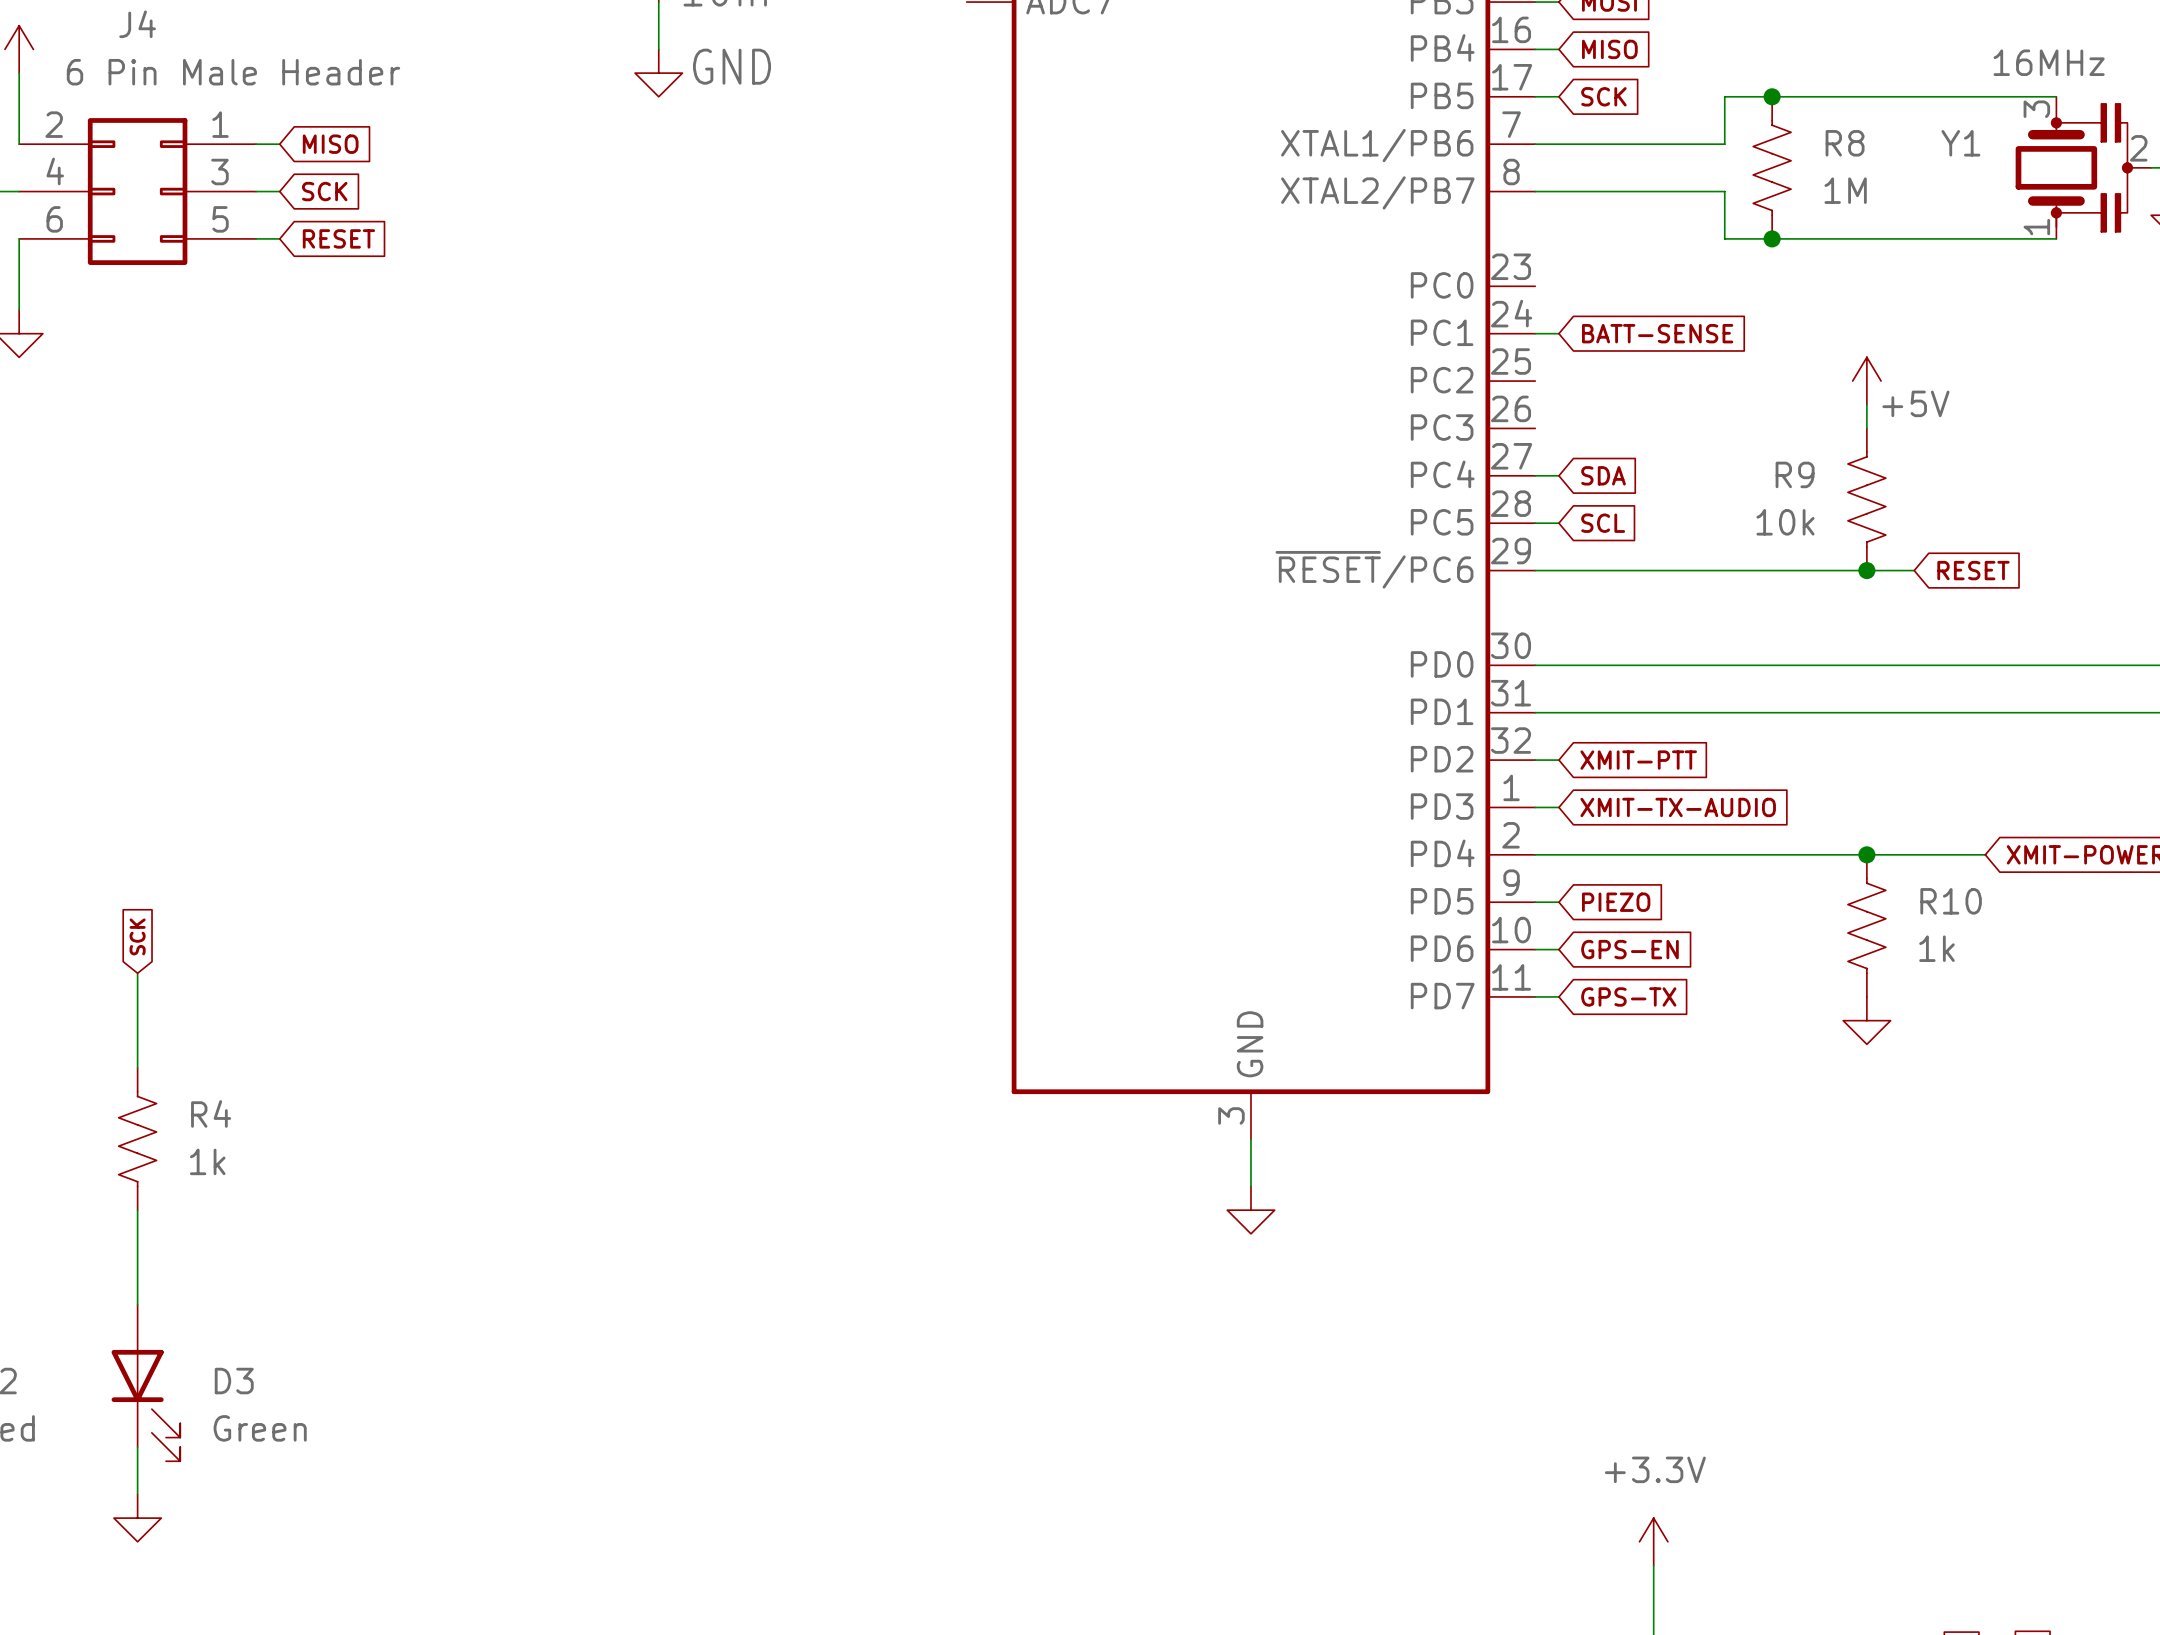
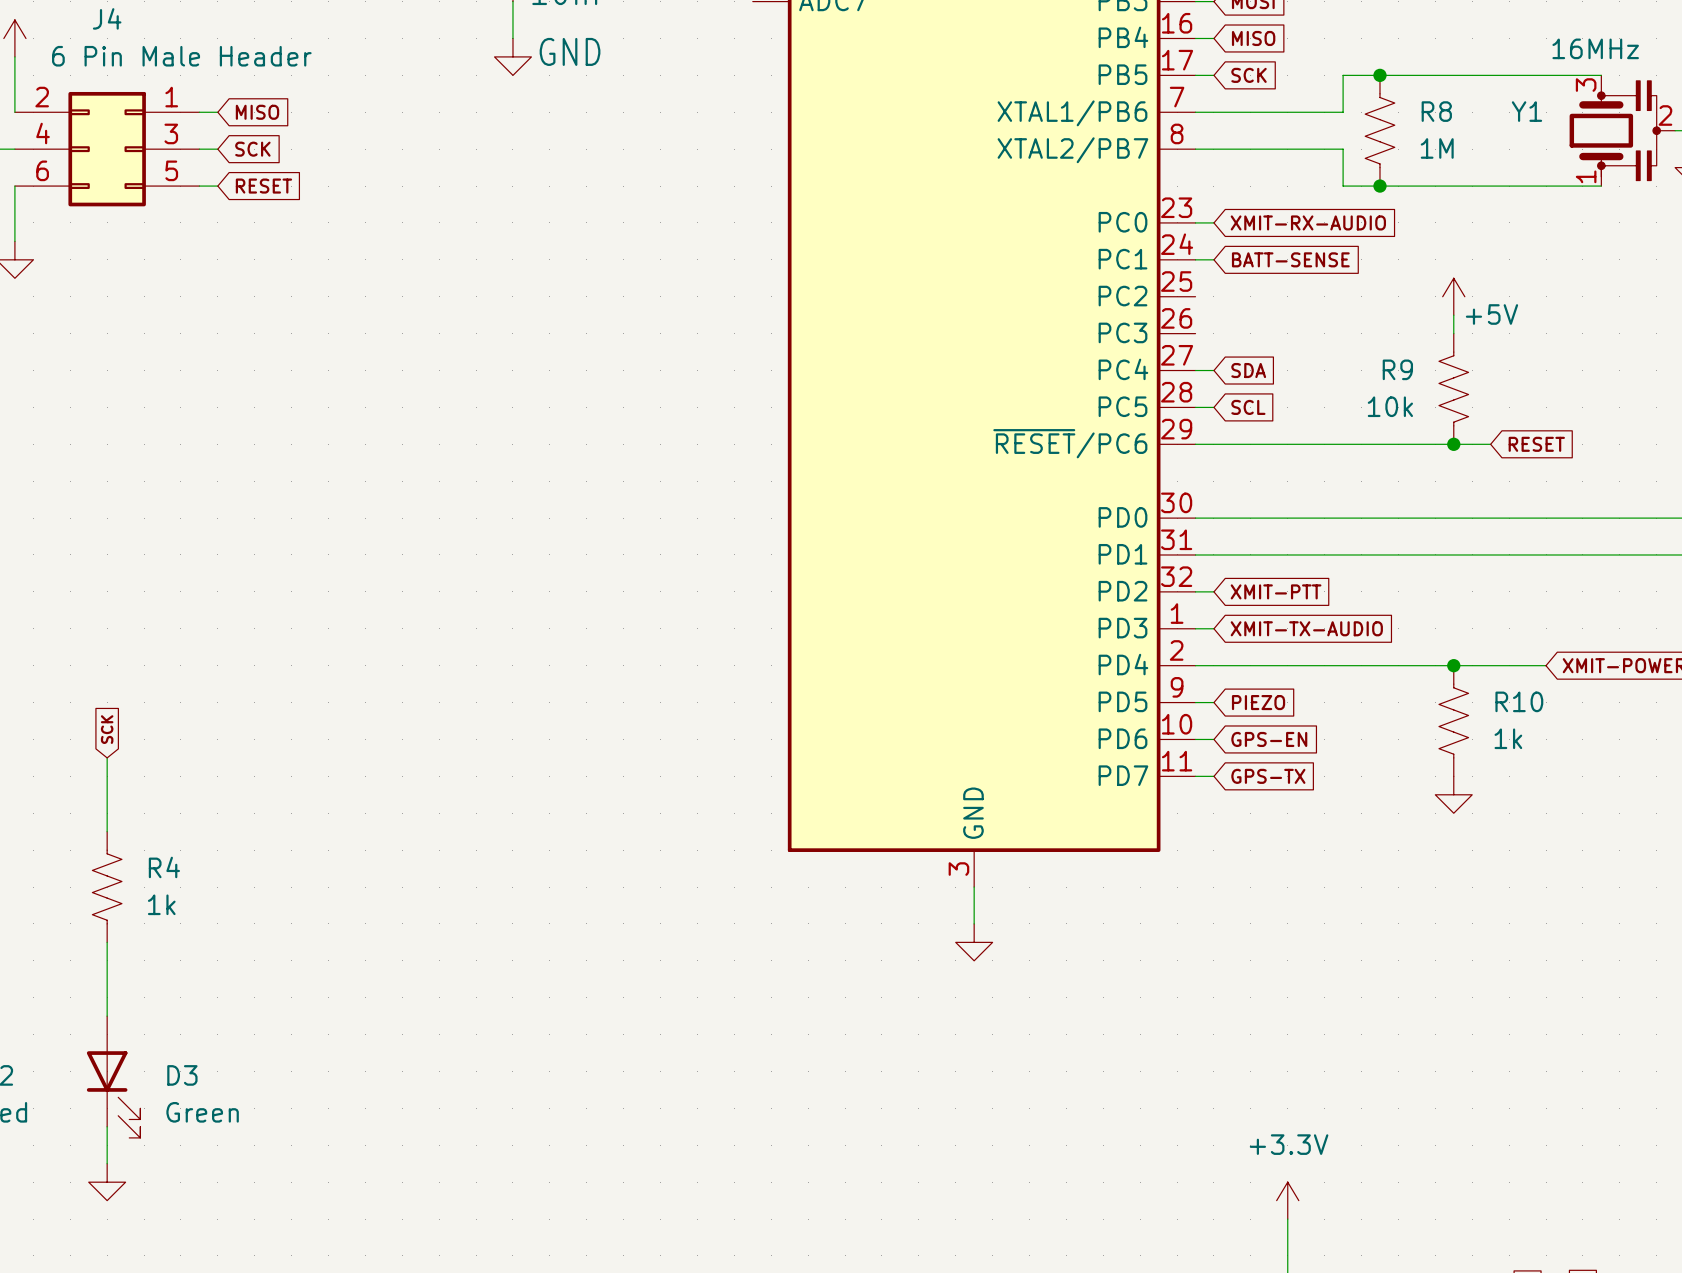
wire: none -> (1195, 222) (1213, 222)
global label: none -> XMIT-RX-AUDIO (1308, 222)

